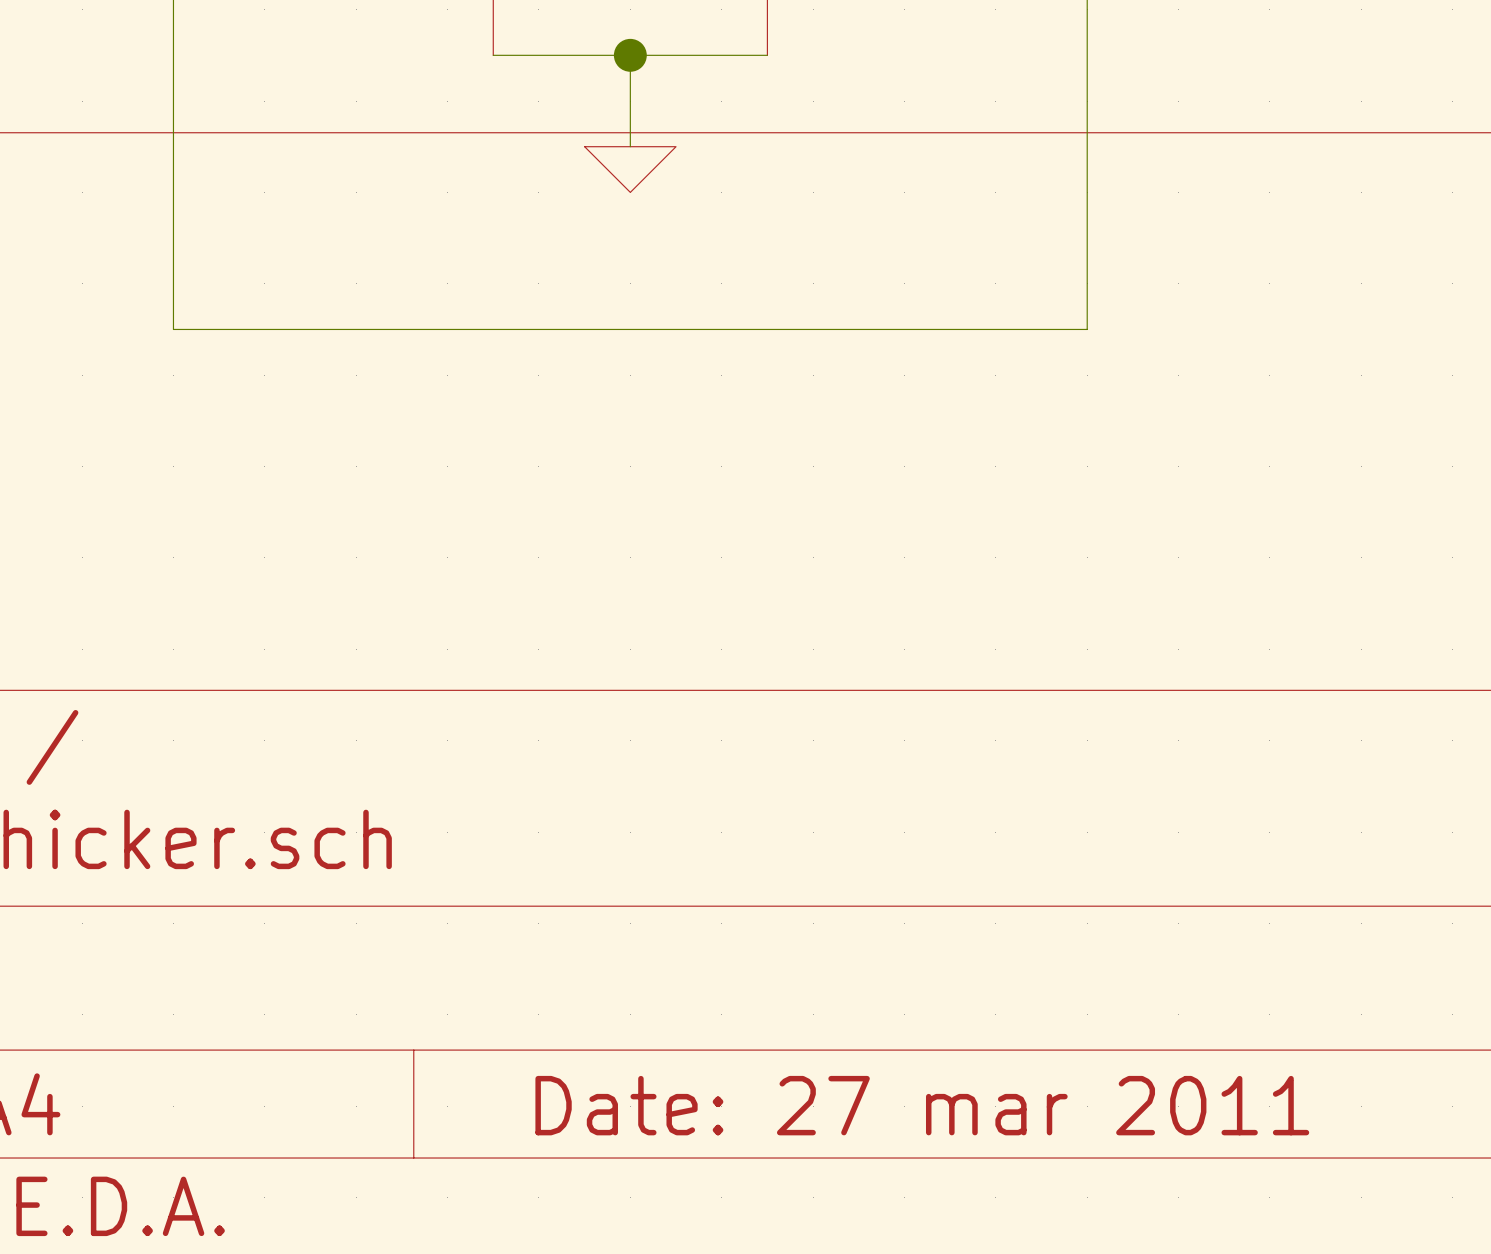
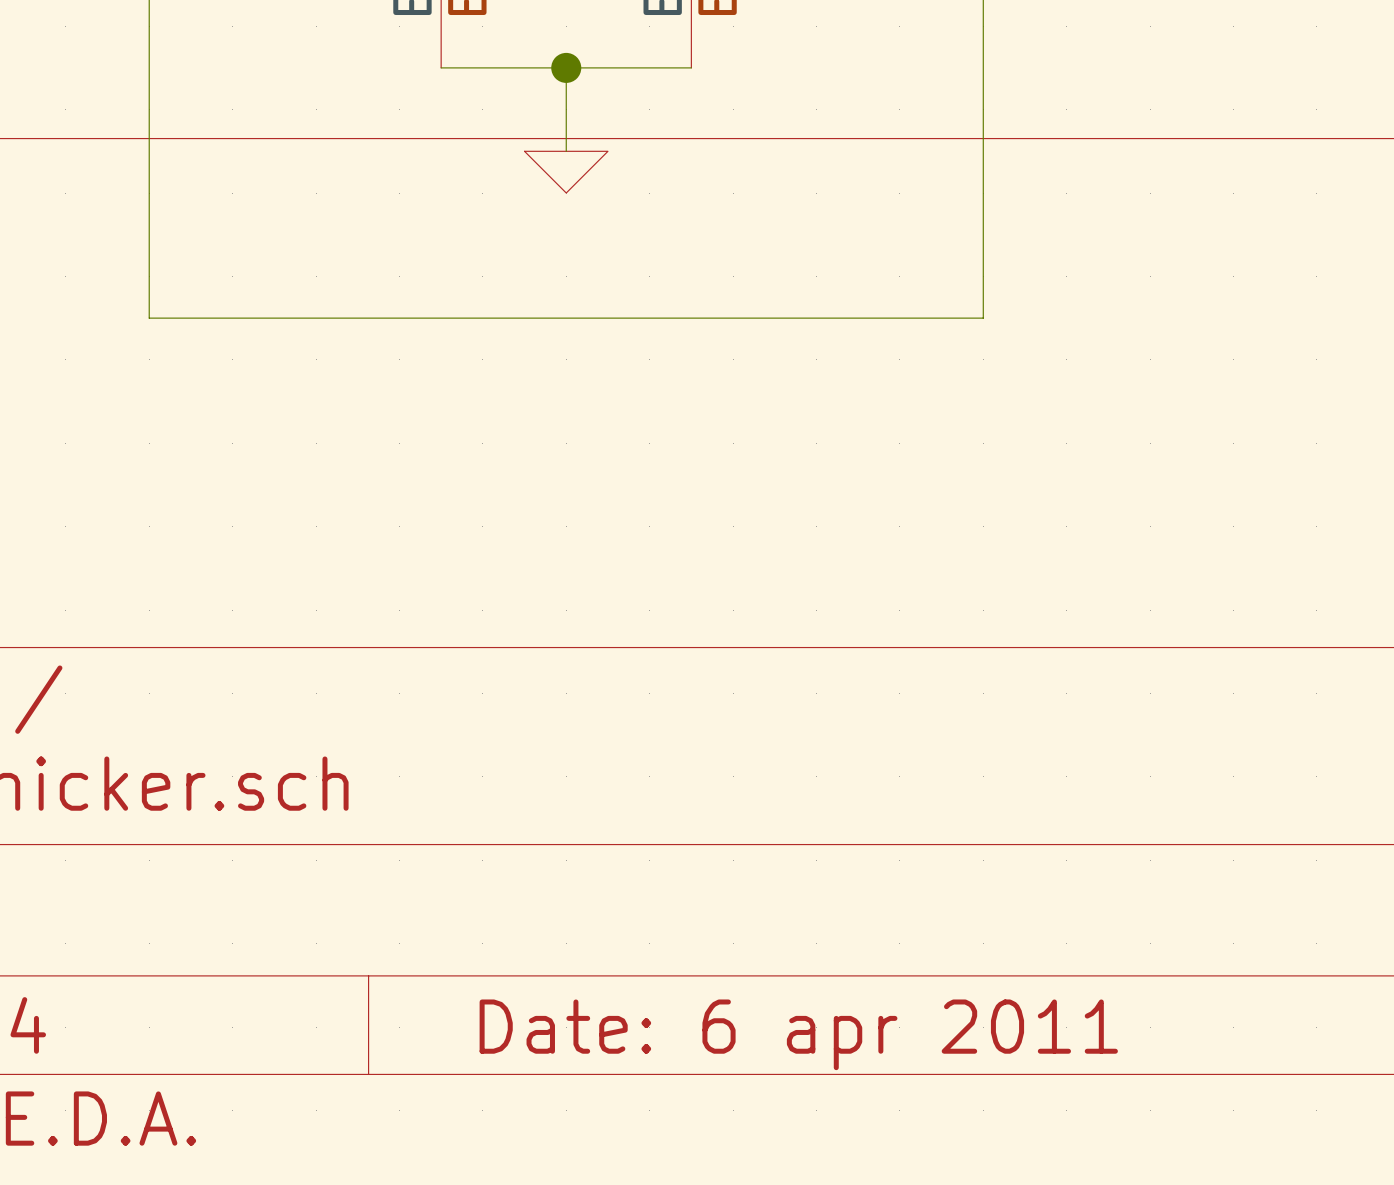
title block: Date: 27 mar 2011 (922, 1105) -> Date: 6 apr 2011 (798, 1034)

